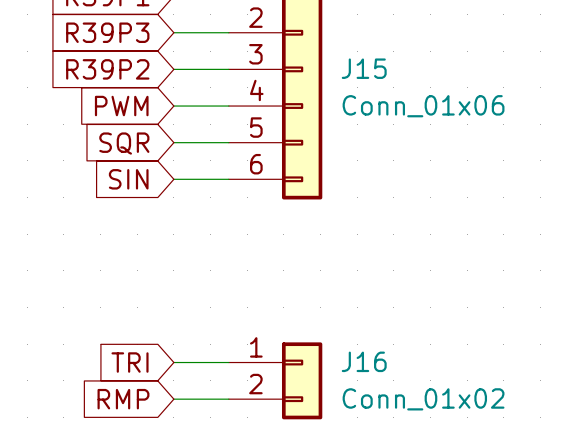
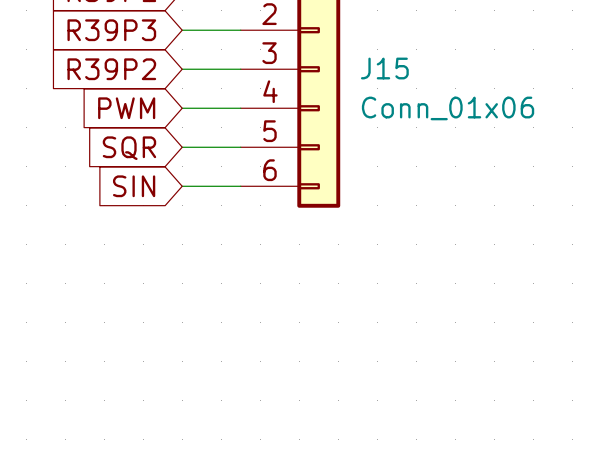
global label: TRI (130, 362) -> none
wire: (173, 362) (228, 362) -> none
J16: Conn_01x02 (275, 380) -> none
global label: RMP (123, 399) -> none
wire: (173, 399) (228, 399) -> none

